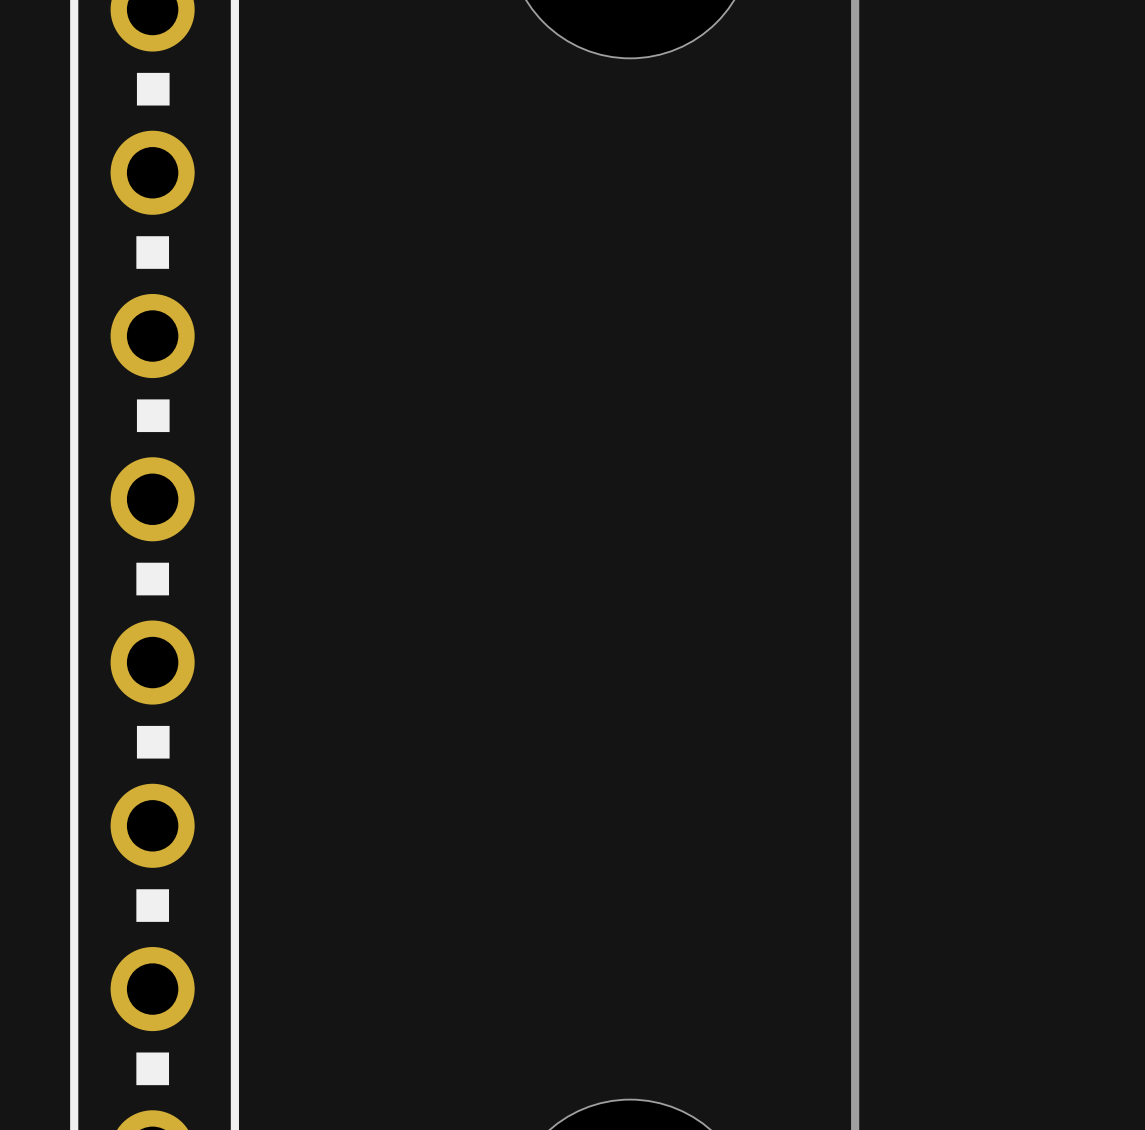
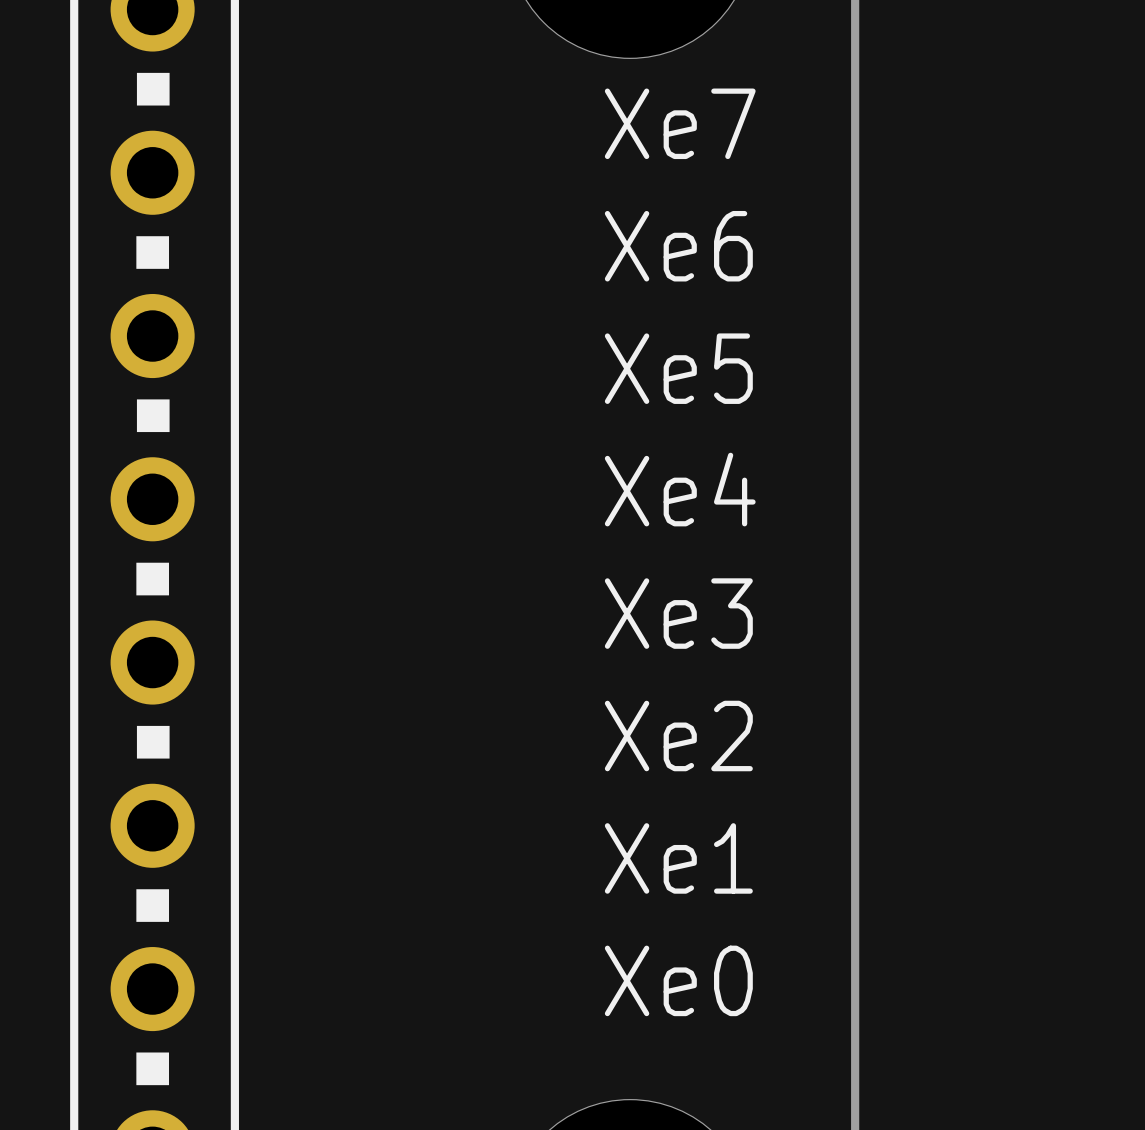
text: none -> Xe7 (680, 123)
text: none -> Xe6 (678, 246)
text: none -> Xe5 (678, 368)
text: none -> Xe4 (680, 489)
text: none -> Xe3 (678, 613)
text: none -> Xe2 (678, 736)
text: none -> Xe1 (678, 858)
text: none -> Xe0 (678, 980)

